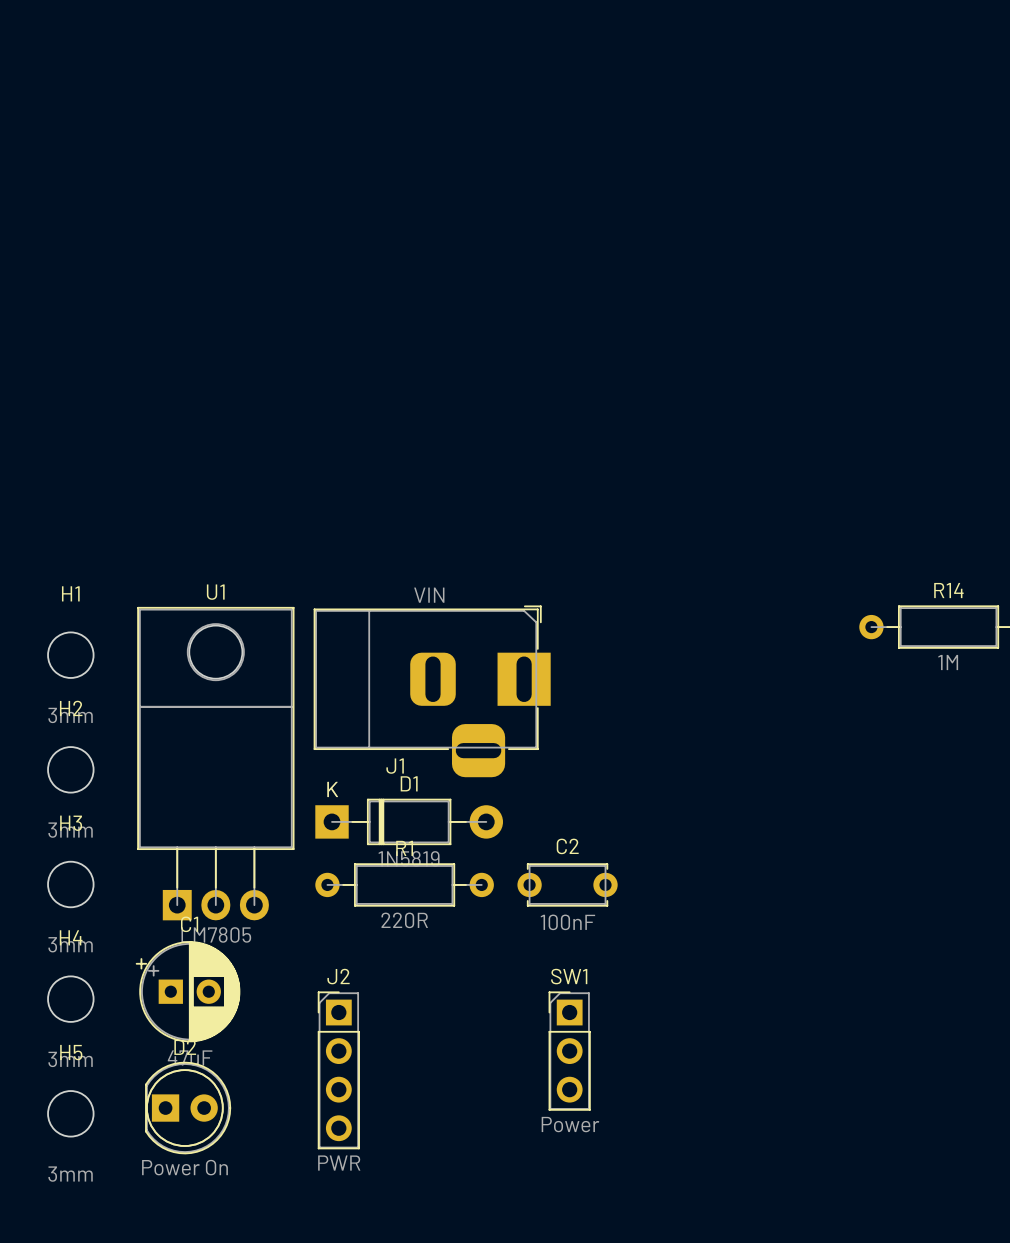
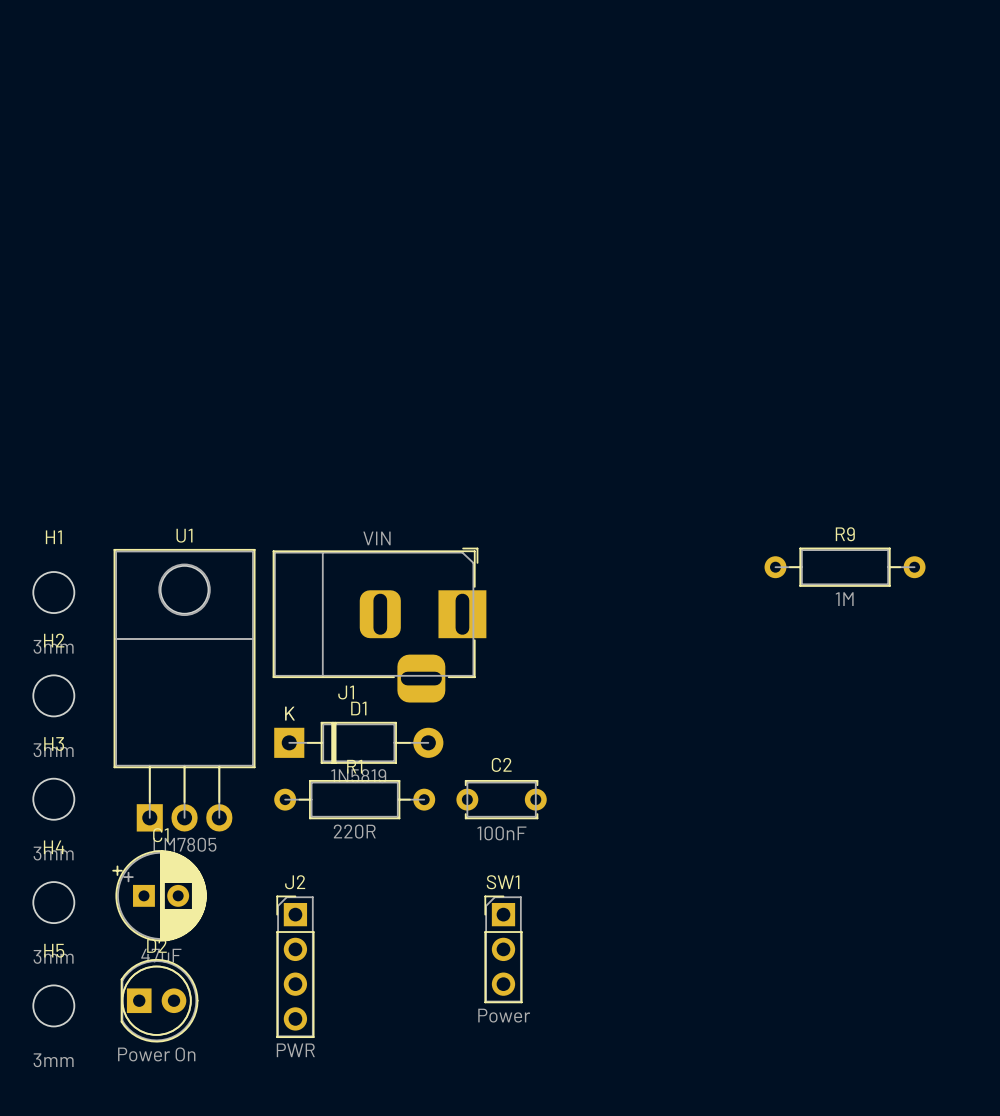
R14 name: R14 (948, 590) -> R9 (845, 534)

